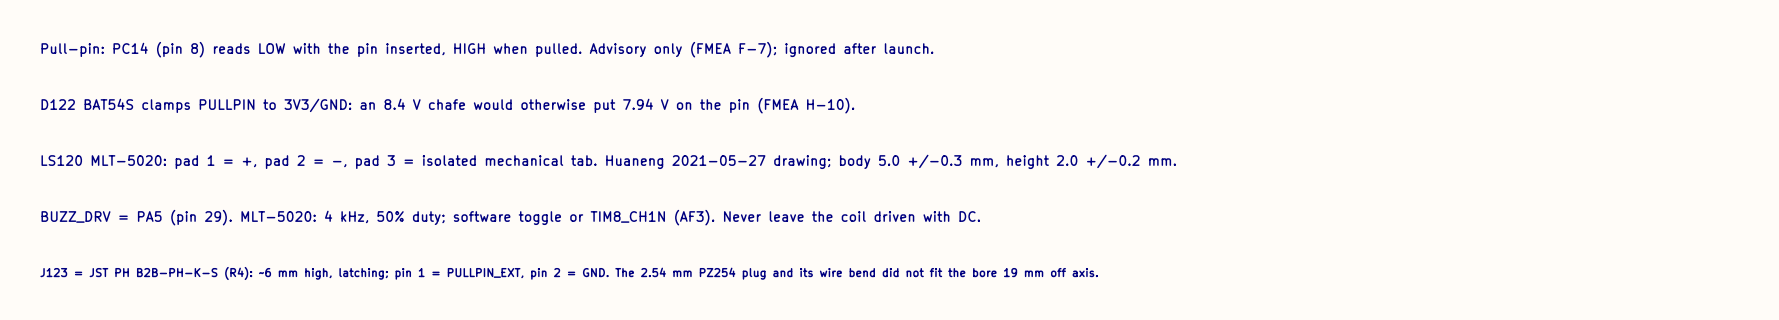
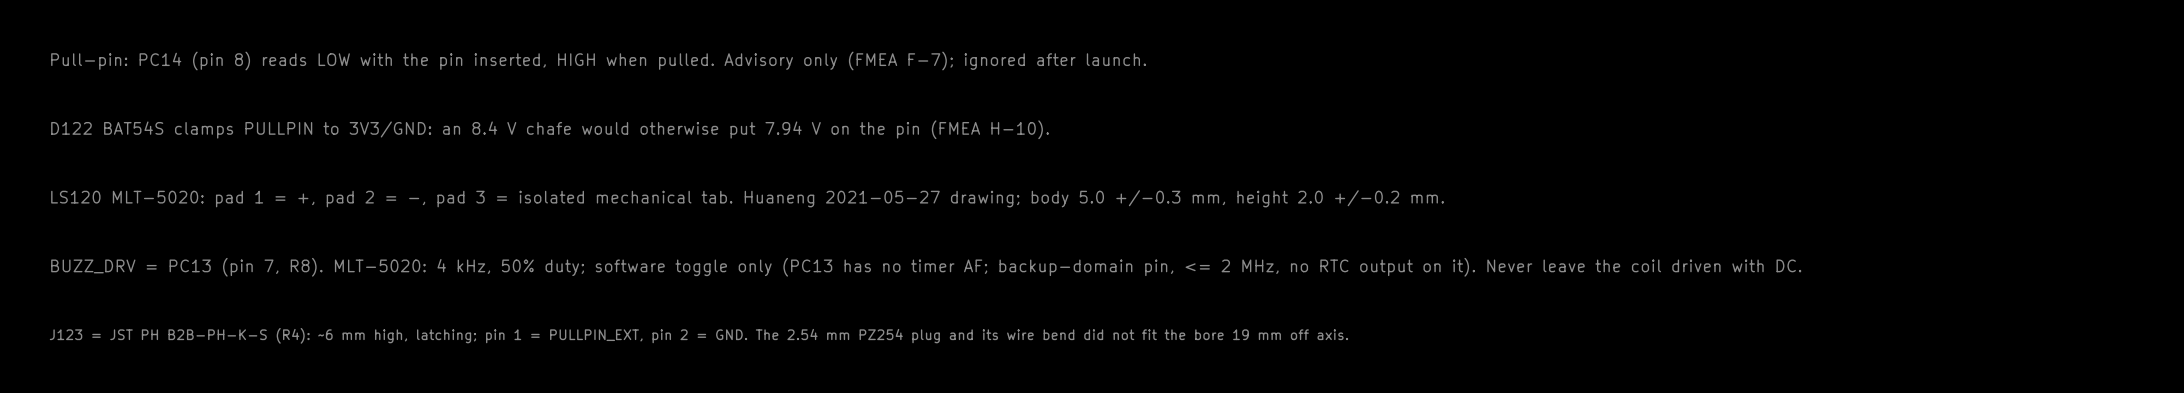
text: BUZZ_DRV = PA5 (pin 29). MLT-5020: 4 kHz, 50% duty; software toggle or TIM8_CH1N (AF3). Never leave the coil driven with DC. (510, 217) -> BUZZ_DRV = PC13 (pin 7, R8). MLT-5020: 4 kHz, 50% duty; software toggle only (PC13 has no timer AF; backup-domain pin, <= 2 MHz, no RTC output on it). Never leave the coil driven with DC. (926, 267)

